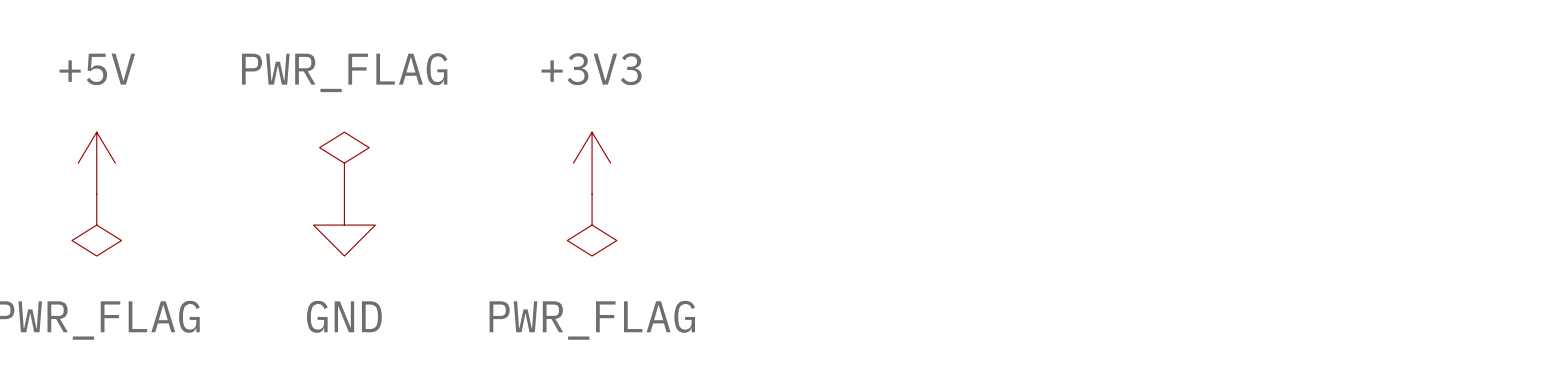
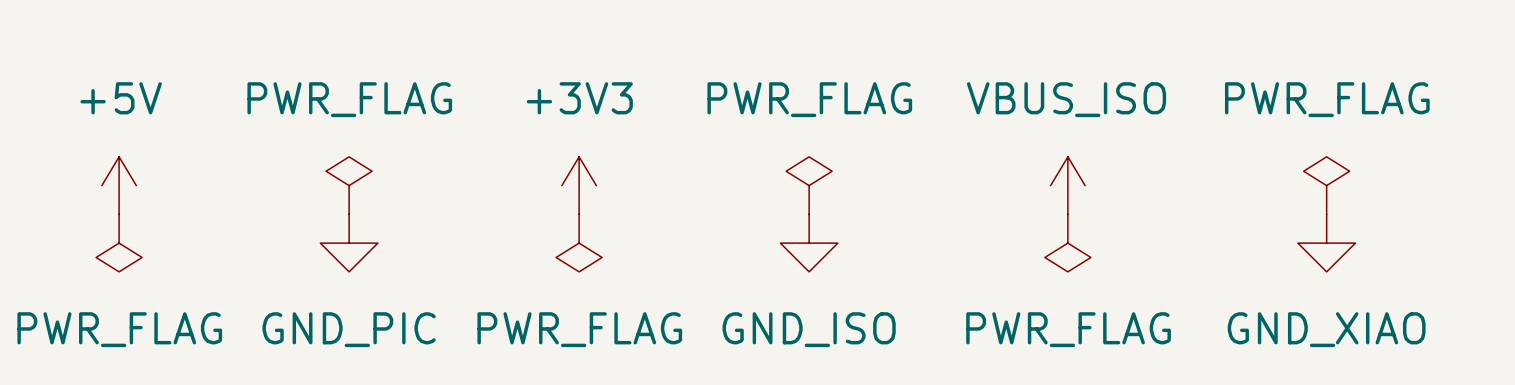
power symbol: none -> PWR_FLAG (809, 185)
power symbol: none -> VBUS_ISO (1067, 185)
power symbol: none -> PWR_FLAG (1326, 185)
power symbol: GND (344, 225) -> GND_PIC (349, 243)
power symbol: none -> GND_ISO (809, 243)
power symbol: none -> PWR_FLAG (1067, 243)
power symbol: none -> GND_XIAO (1326, 243)

